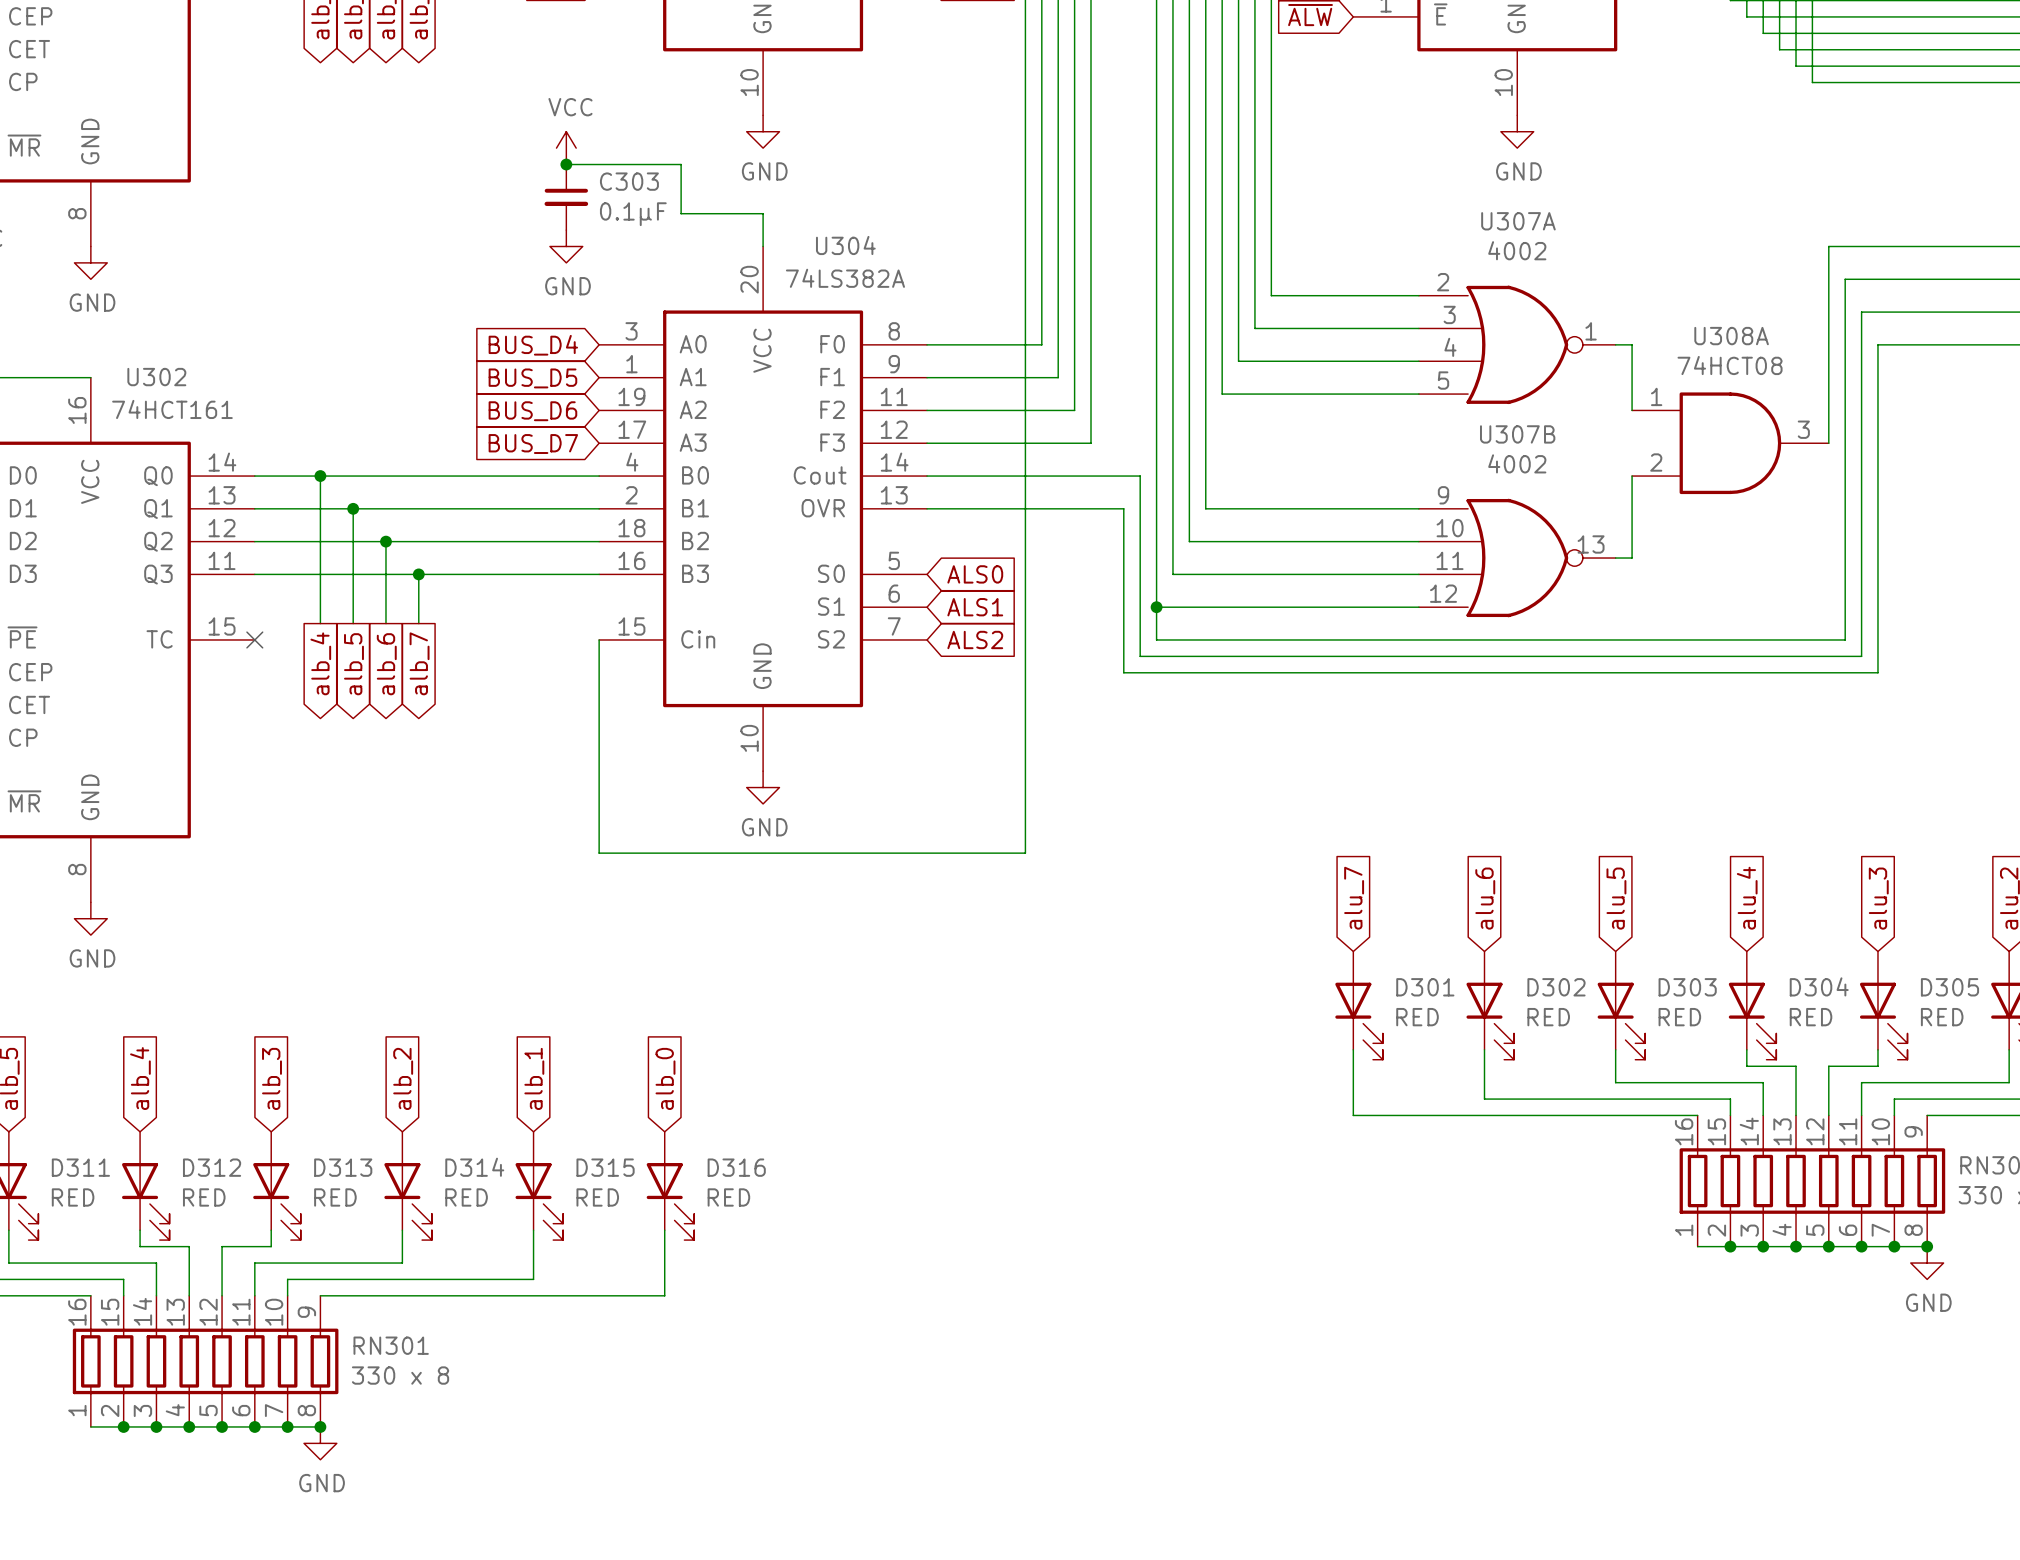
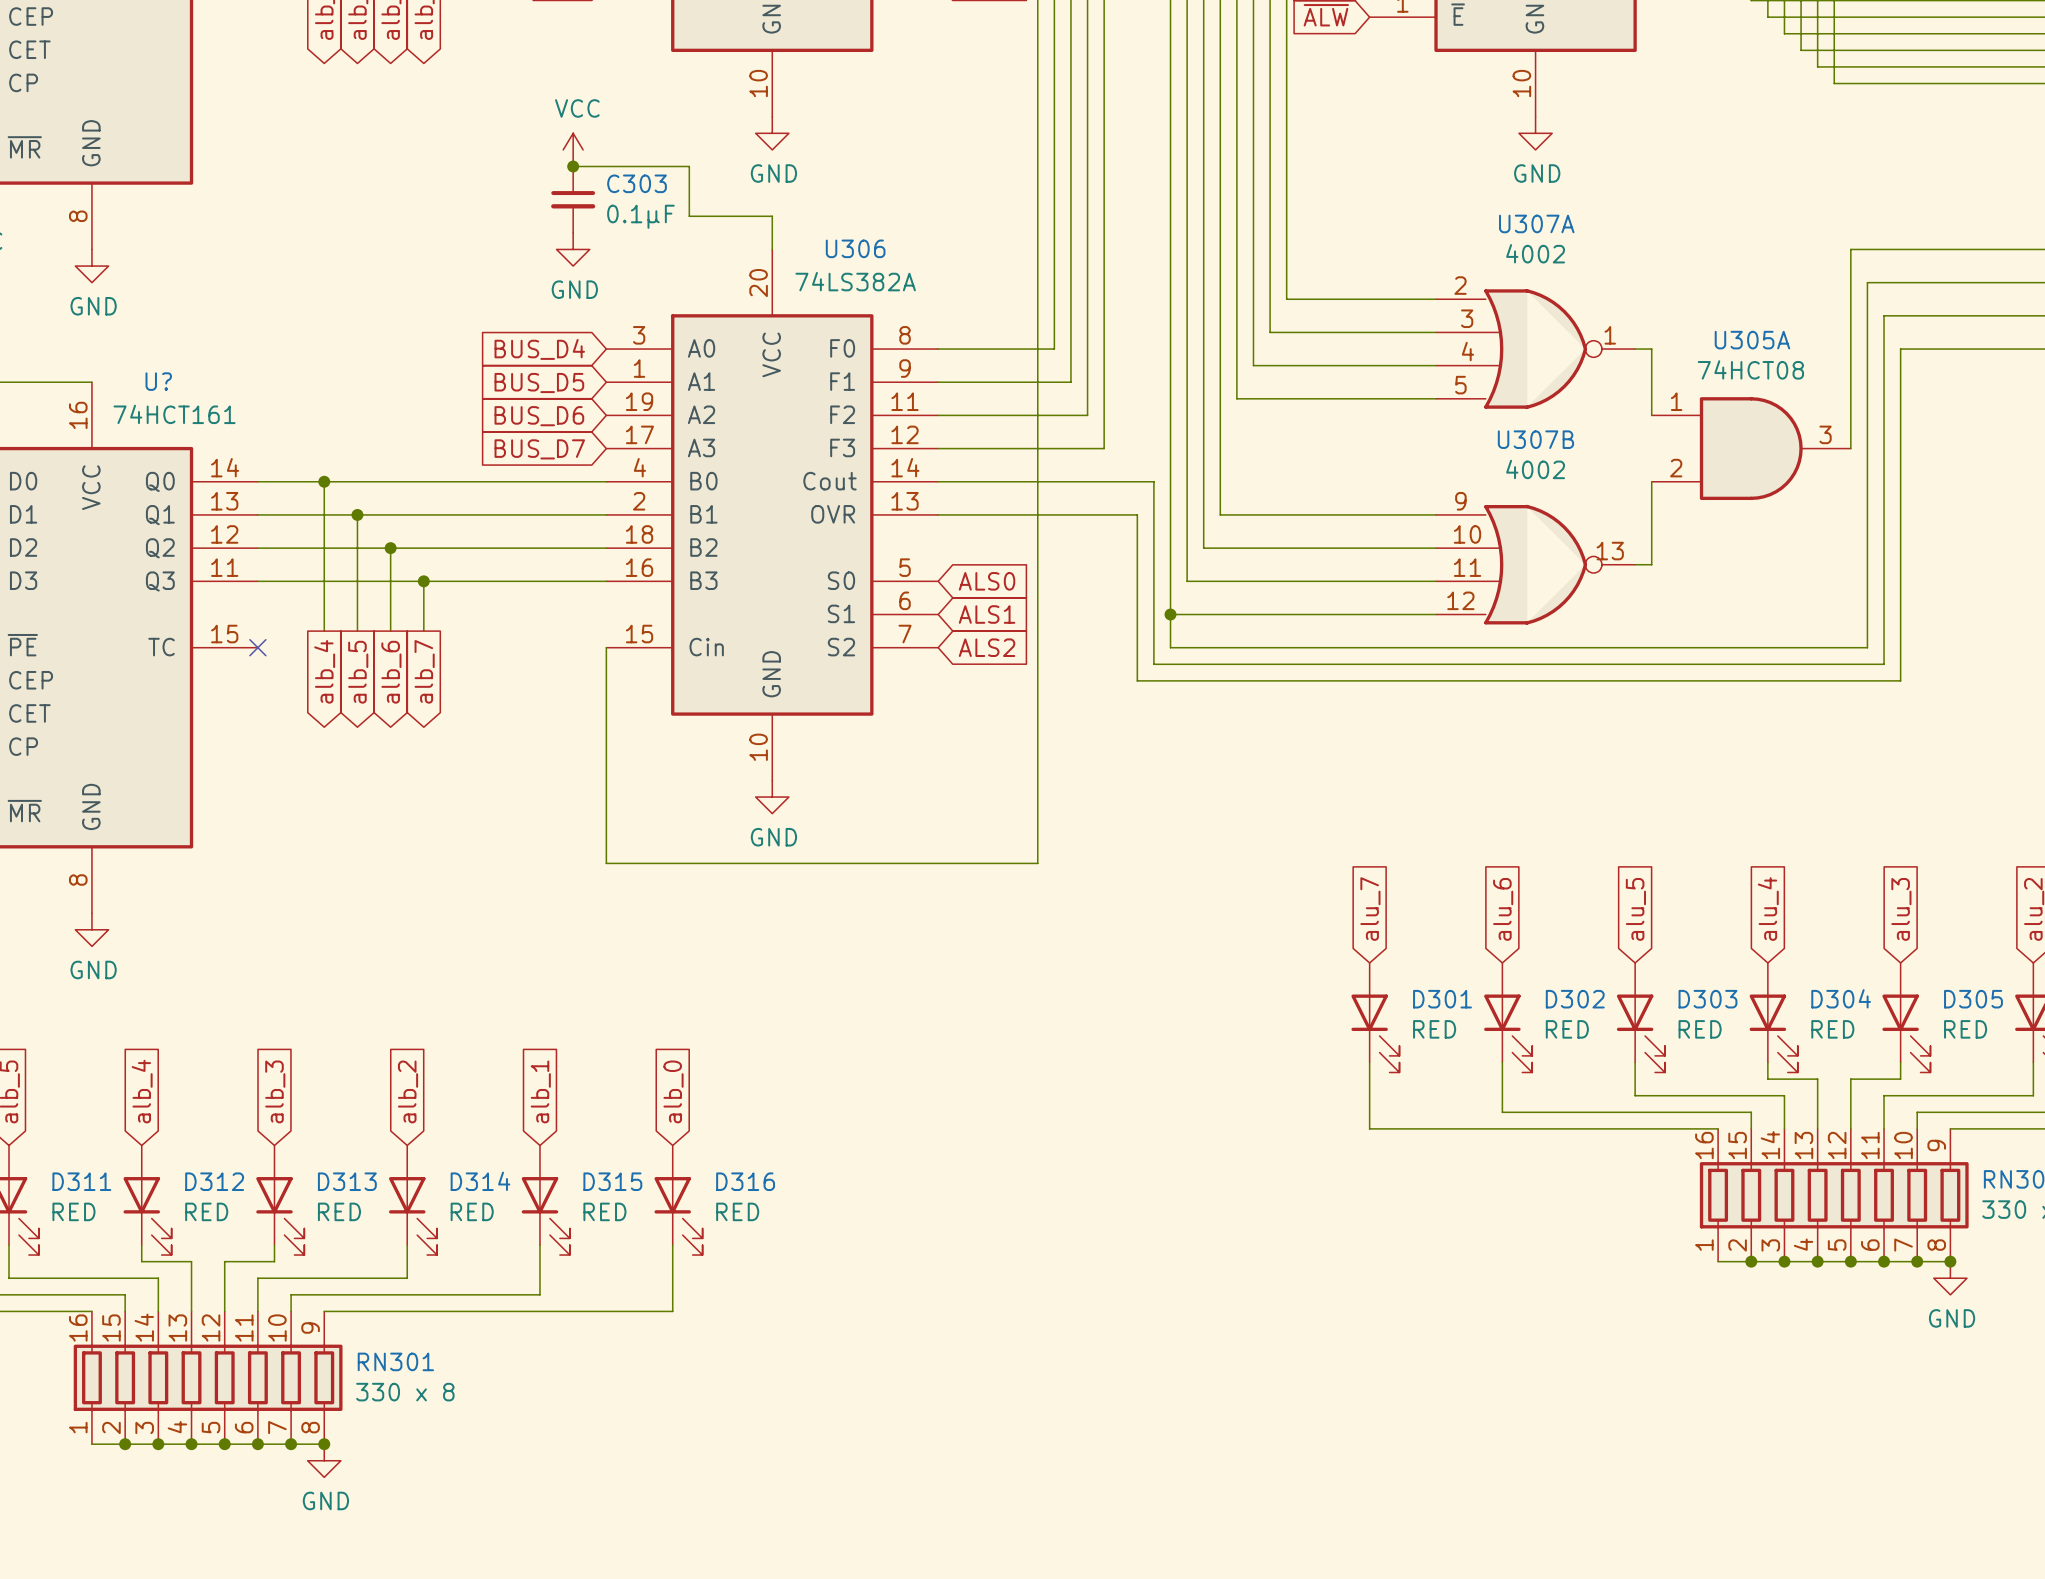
U304 name: U304 (845, 245) -> U306 (855, 248)
U308A name: U308A (1731, 336) -> U305A (1752, 340)
U302 name: U302 (156, 377) -> U? (158, 381)

